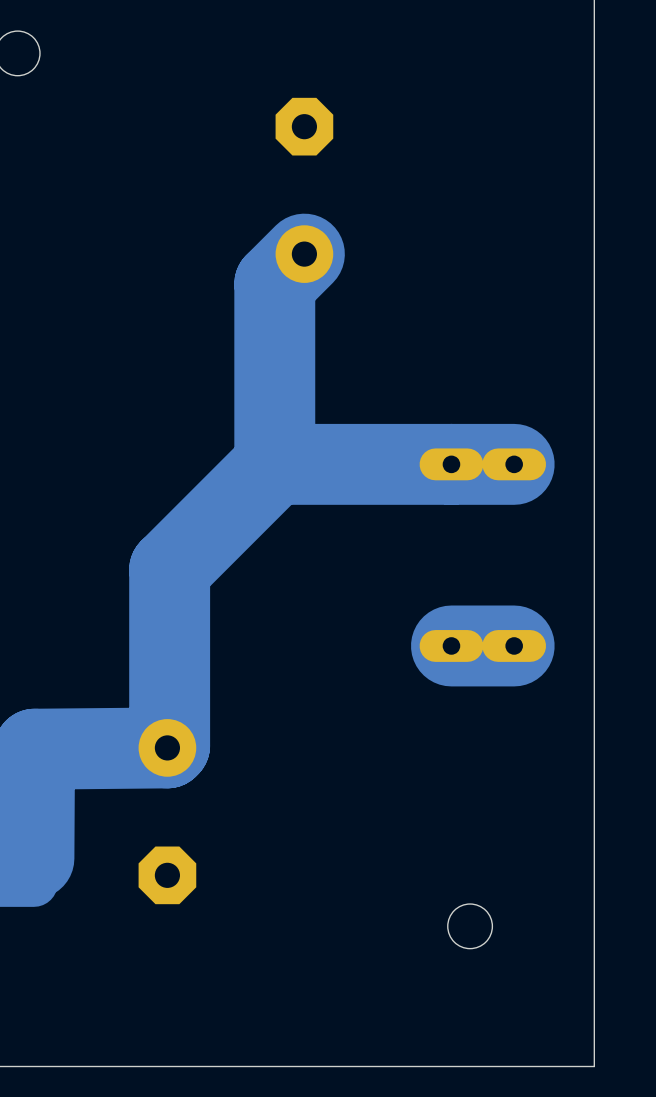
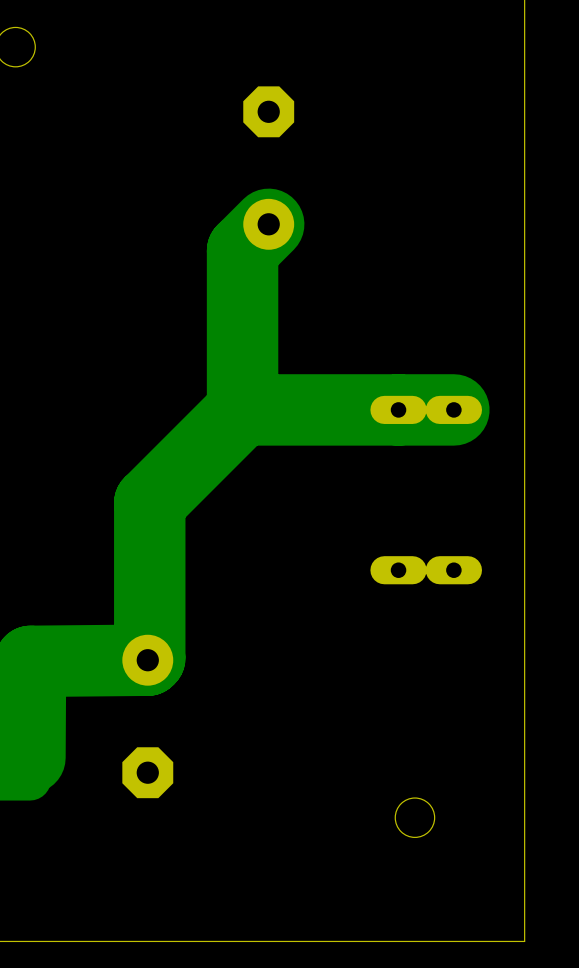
track: (514, 645) (451, 645) -> none

